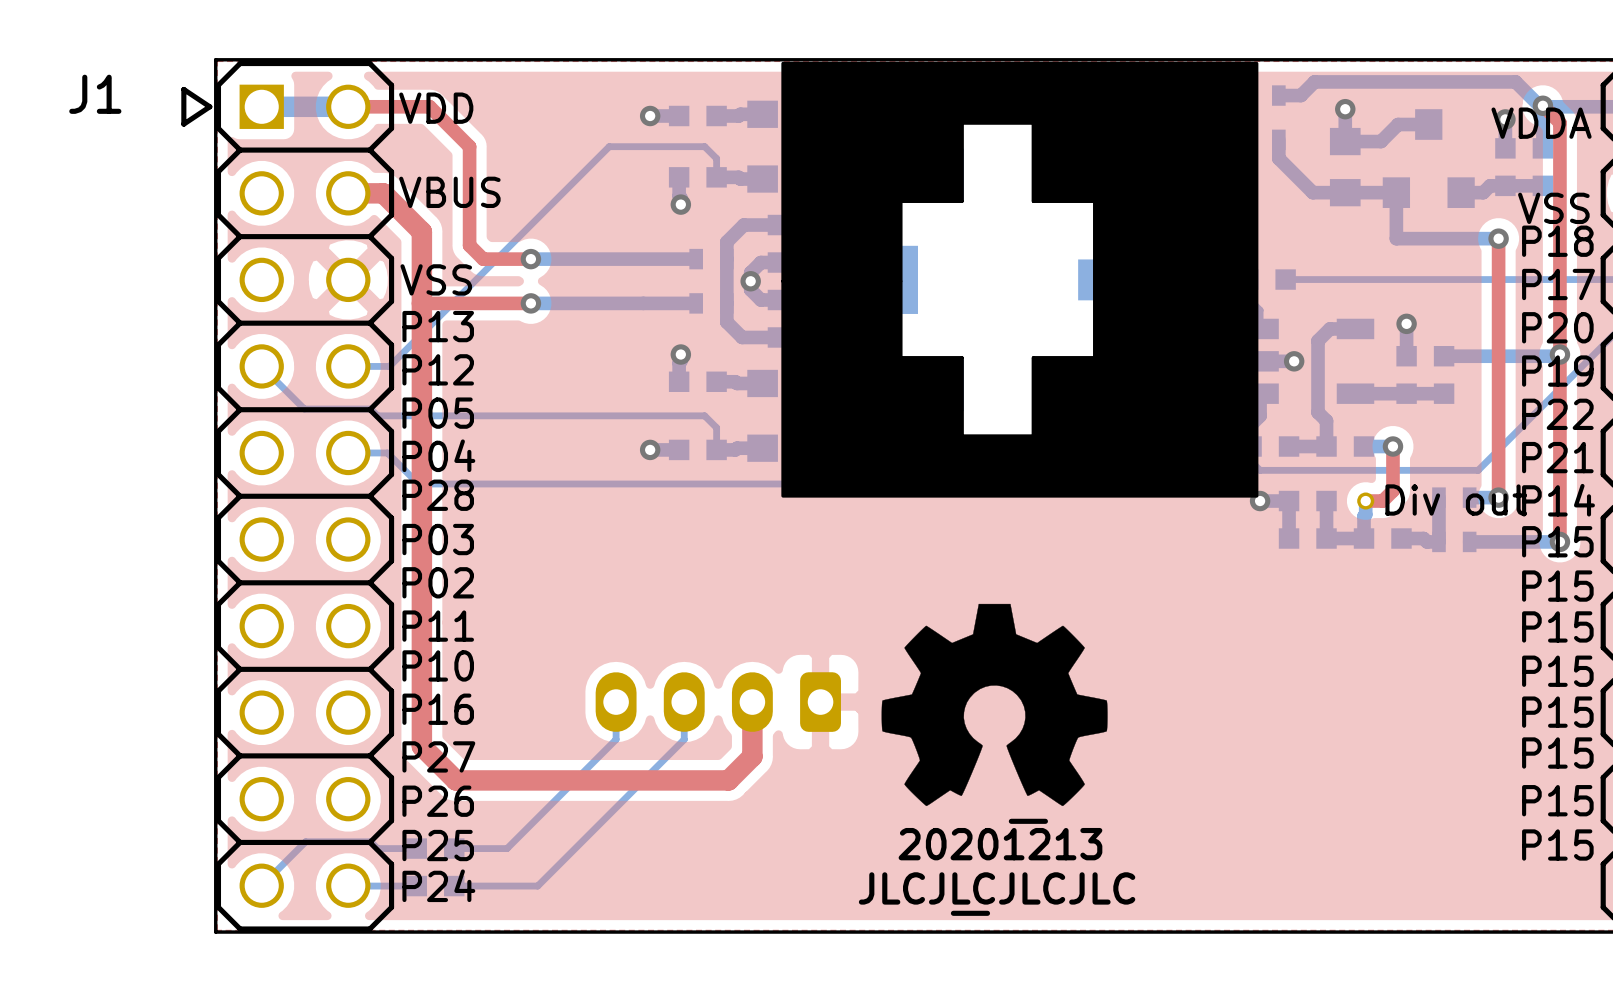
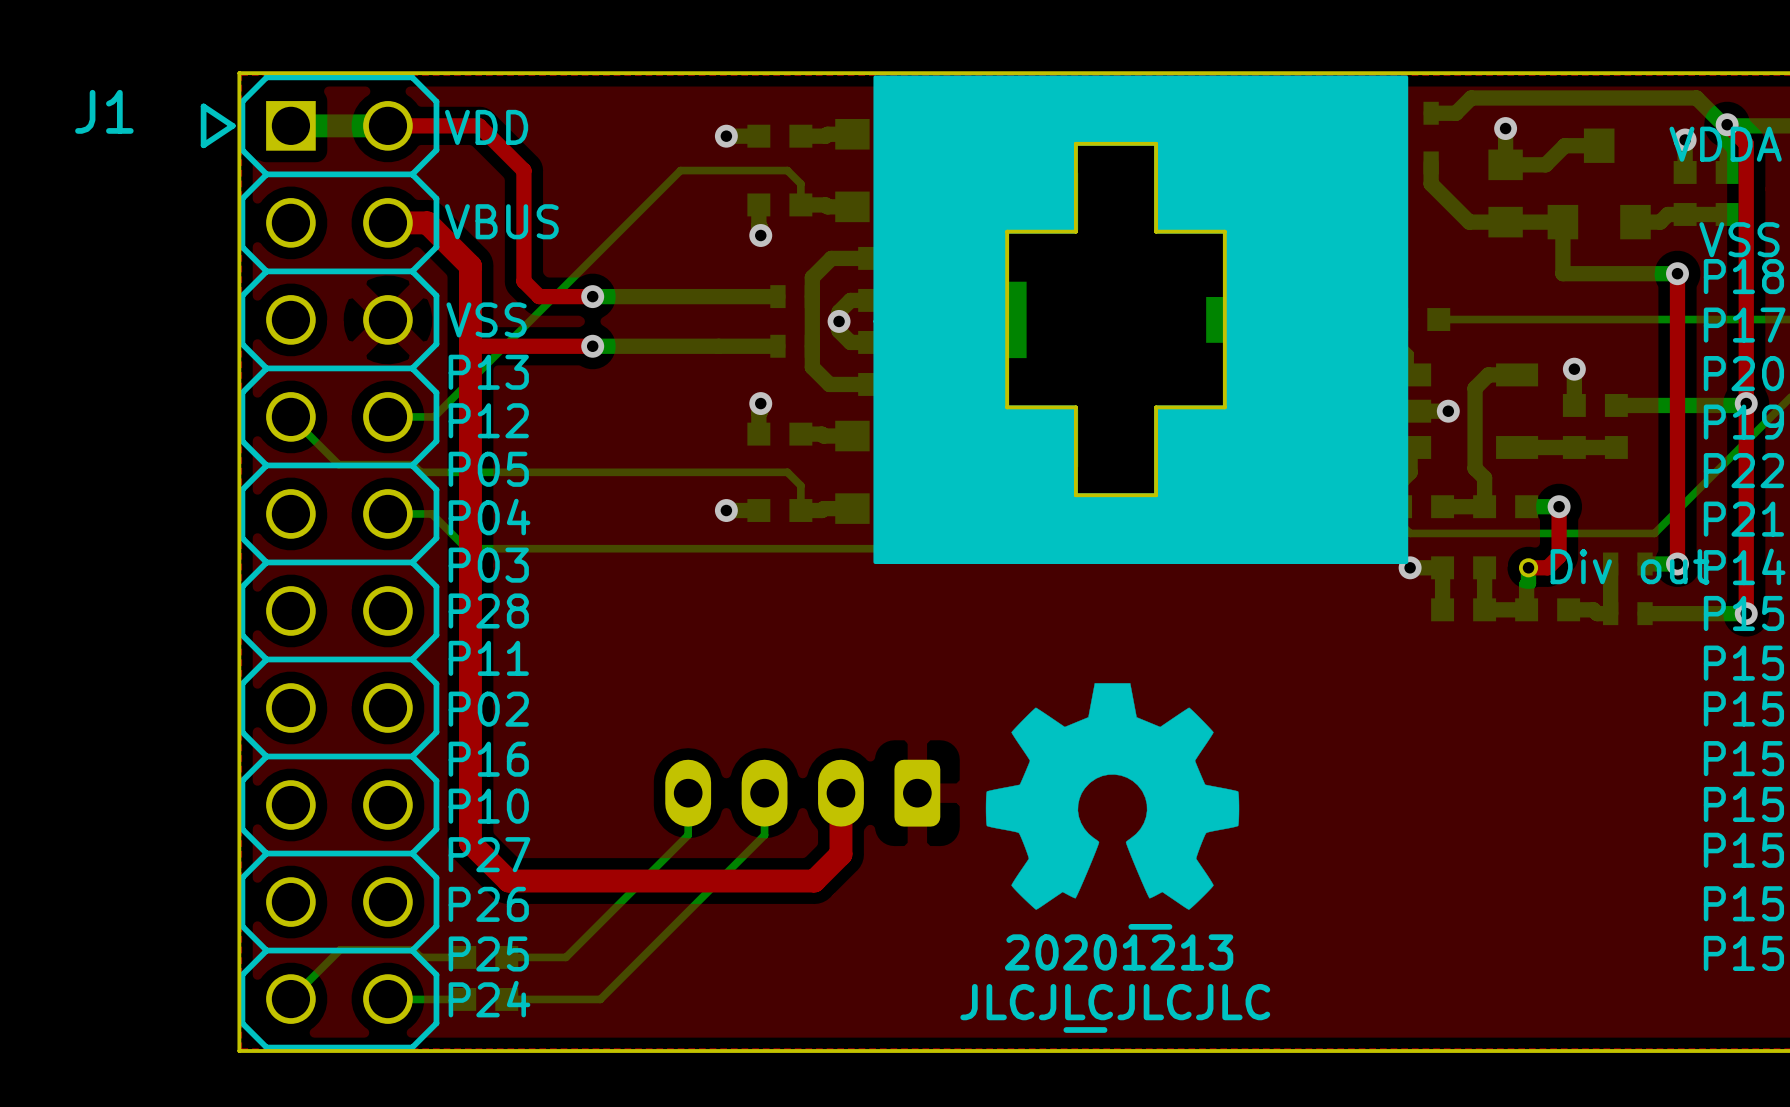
text: P28 (438, 495) -> P03 (488, 565)
text: P03 (438, 539) -> P28 (488, 610)
text: P02 (438, 582) -> P11 (488, 658)
text: P11 (438, 626) -> P02 (488, 709)
text position: P10 (438, 665) -> P10 (488, 806)
text position: P16 (438, 709) -> P16 (488, 759)

